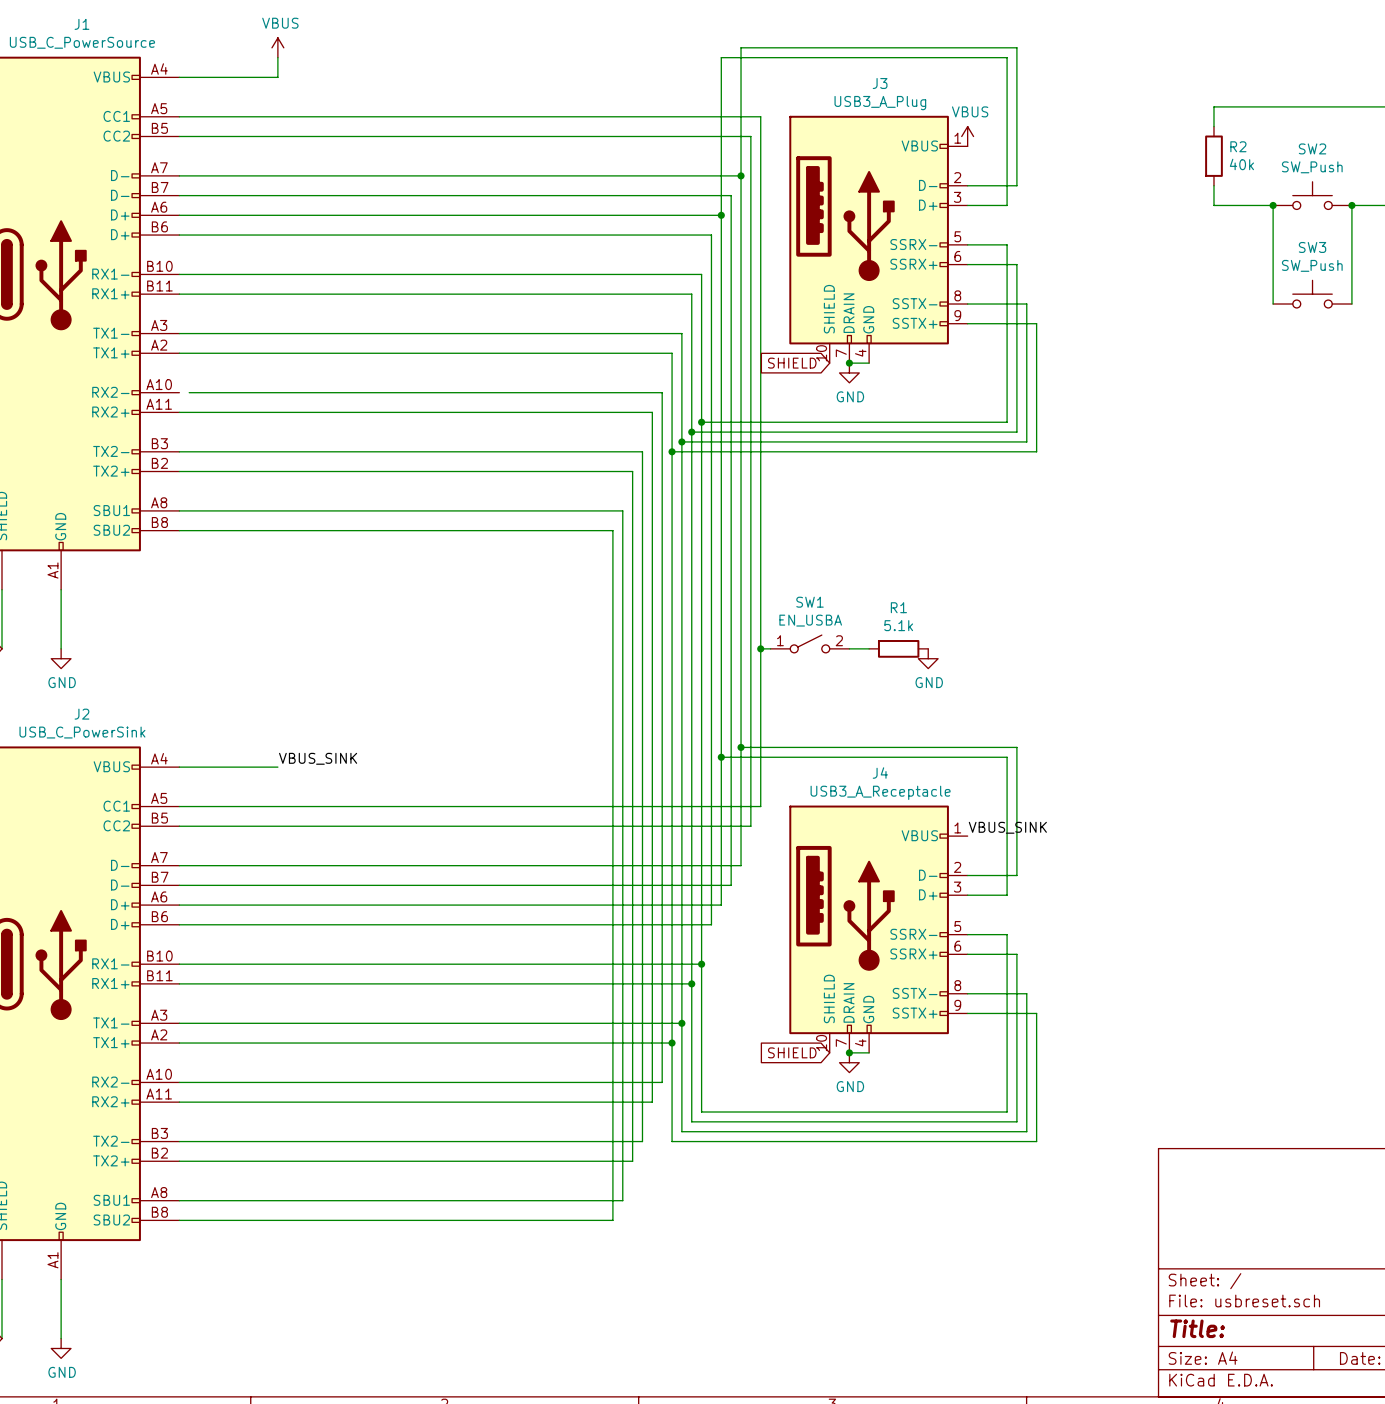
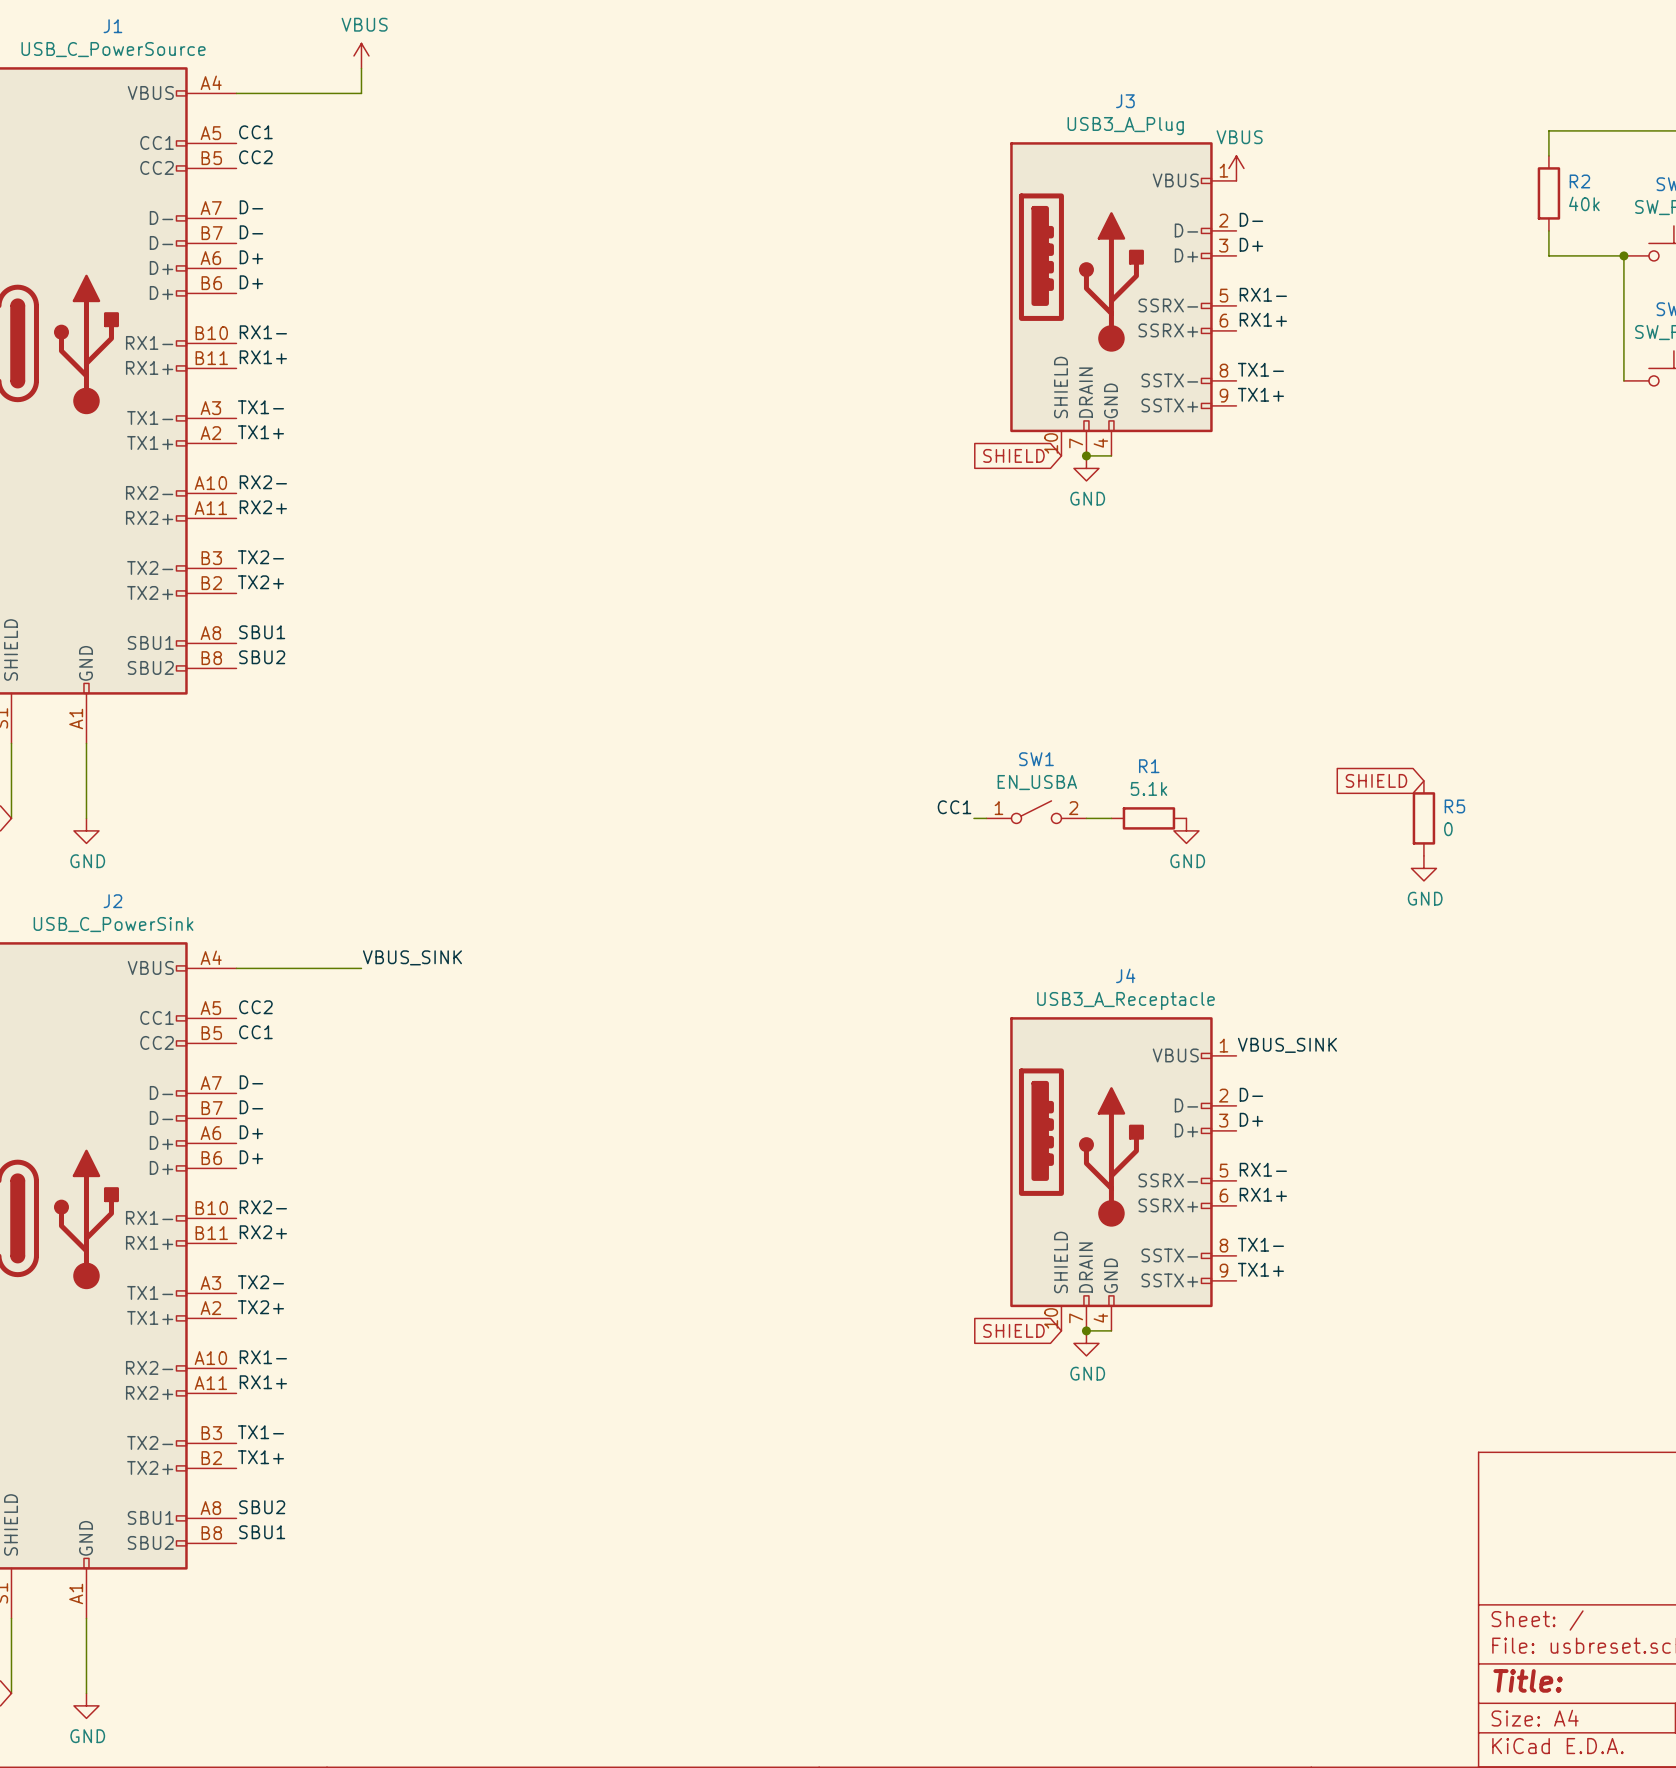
label: none -> CC1 (255, 132)
wire: (179, 116) (760, 116) (760, 806) (179, 806) -> none
label: none -> CC2 (255, 157)
wire: (179, 136) (750, 136) (750, 826) (179, 826) -> none
label: none -> D- (251, 207)
wire: (179, 175) (741, 175) -> none
junction: (741, 175) -> none
label: none -> D- (1251, 219)
wire: (967, 185) (1016, 185) (1016, 47) (741, 47) (741, 865) (179, 865) -> none
label: none -> D- (251, 232)
wire: (179, 195) (731, 195) (731, 885) (179, 885) -> none
label: none -> D+ (1251, 244)
wire: (967, 205) (1007, 205) (1007, 57) (721, 57) (721, 905) (179, 905) -> none
label: none -> D+ (251, 257)
wire: (179, 215) (721, 215) -> none
junction: (721, 215) -> none
label: none -> D+ (251, 282)
wire: (179, 235) (711, 235) (711, 924) (179, 924) -> none
label: none -> RX1- (1263, 294)
wire: (967, 244) (1007, 244) (1007, 422) (701, 422) -> none
label: none -> RX1+ (1263, 319)
wire: (967, 264) (1016, 264) (1016, 432) (691, 432) -> none
label: none -> RX1- (263, 332)
wire: (179, 274) (701, 274) (701, 1111) (1007, 1111) (1007, 934) (967, 934) -> none
label: none -> RX1+ (263, 357)
wire: (179, 294) (691, 294) (691, 1121) (1016, 1121) (1016, 954) (967, 954) -> none
label: none -> TX1- (1260, 369)
wire: (967, 304) (1026, 304) (1026, 441) (681, 441) -> none
label: none -> TX1+ (1260, 394)
wire: (967, 323) (1036, 323) (1036, 451) (672, 451) -> none
label: none -> TX1- (260, 407)
wire: (179, 333) (681, 333) (681, 1131) (1026, 1131) (1026, 993) (967, 993) -> none
label: none -> TX1+ (260, 432)
wire: (179, 353) (672, 353) (672, 1141) (1036, 1141) (1036, 1013) (967, 1013) -> none
label: none -> RX2- (263, 482)
wire: (189, 392) (662, 392) (662, 1082) (179, 1082) -> none
label: none -> RX2+ (263, 507)
wire: (179, 412) (652, 412) (652, 1102) (179, 1102) -> none
junction: (701, 422) -> none
junction: (691, 432) -> none
junction: (681, 441) -> none
label: none -> TX2- (260, 557)
wire: (179, 451) (642, 451) (642, 1141) (179, 1141) -> none
junction: (672, 451) -> none
label: none -> TX2+ (260, 582)
wire: (179, 471) (632, 471) (632, 1161) (179, 1161) -> none
label: none -> SBU1 (262, 632)
wire: (179, 510) (622, 510) (622, 1200) (179, 1200) -> none
label: none -> SBU2 (262, 657)
wire: (179, 530) (612, 530) (612, 1220) (179, 1220) -> none
global label: none -> SHIELD (1376, 780)
label: none -> CC1 (954, 807)
junction: (760, 648) -> none
R5: none -> 0 (1423, 818)
power symbol: none -> GND (1423, 868)
wire: (741, 747) (1016, 747) (1016, 875) (967, 875) -> none
junction: (741, 747) -> none
wire: (721, 757) (1007, 757) (1007, 895) (967, 895) -> none
junction: (721, 757) -> none
label: none -> CC2 (255, 1007)
label: none -> CC1 (255, 1032)
label: none -> D- (251, 1082)
label: none -> D- (1251, 1094)
label: none -> D- (251, 1107)
label: none -> D+ (1251, 1119)
label: none -> D+ (251, 1132)
label: none -> D+ (251, 1157)
label: none -> RX1- (1263, 1169)
label: none -> RX1+ (1263, 1194)
label: none -> RX2- (263, 1207)
wire: (179, 964) (701, 964) -> none
junction: (701, 964) -> none
label: none -> RX2+ (263, 1232)
wire: (179, 983) (691, 983) -> none
junction: (691, 983) -> none
label: none -> TX1- (1260, 1244)
label: none -> TX1+ (1260, 1269)
label: none -> TX2- (260, 1282)
wire: (179, 1023) (681, 1023) -> none
junction: (681, 1023) -> none
label: none -> TX2+ (260, 1307)
wire: (179, 1043) (672, 1043) -> none
junction: (672, 1043) -> none
label: none -> RX1- (263, 1357)
label: none -> RX1+ (263, 1382)
label: none -> TX1- (260, 1432)
label: none -> TX1+ (260, 1457)
label: none -> SBU2 (262, 1507)
label: none -> SBU1 (262, 1532)

